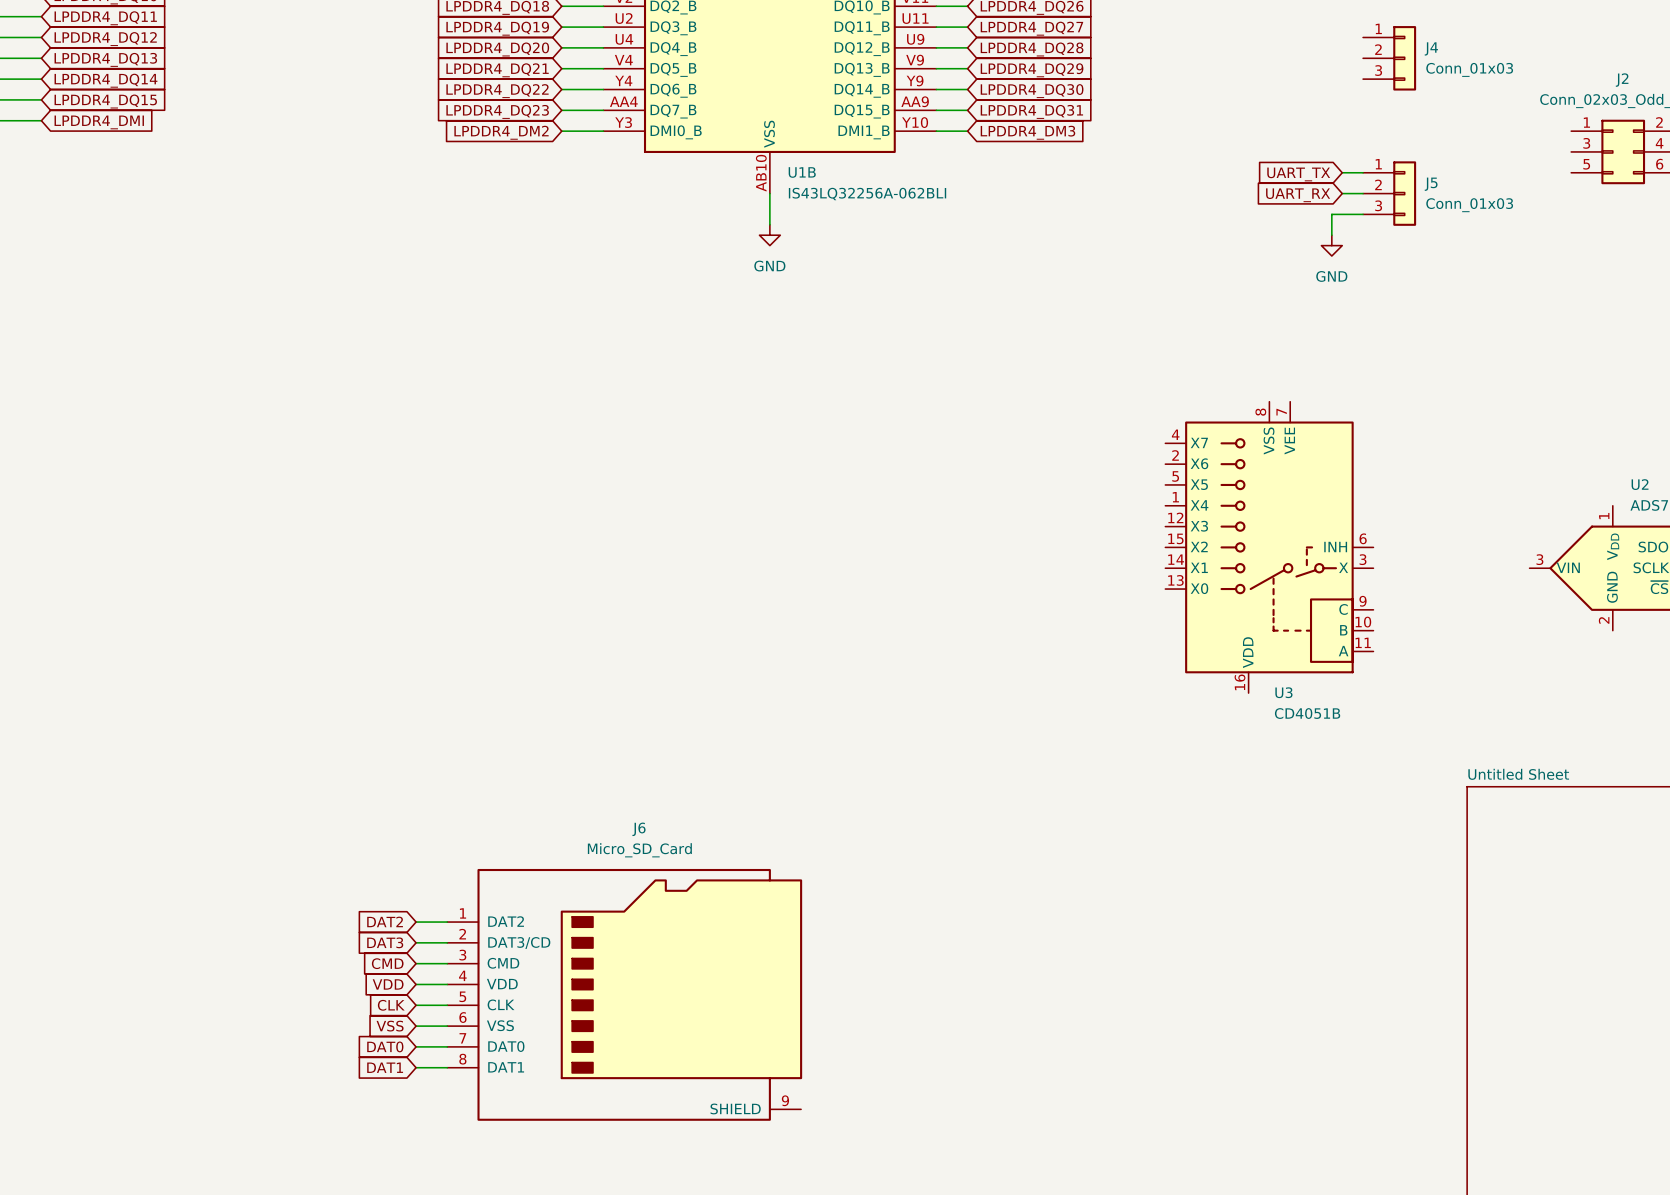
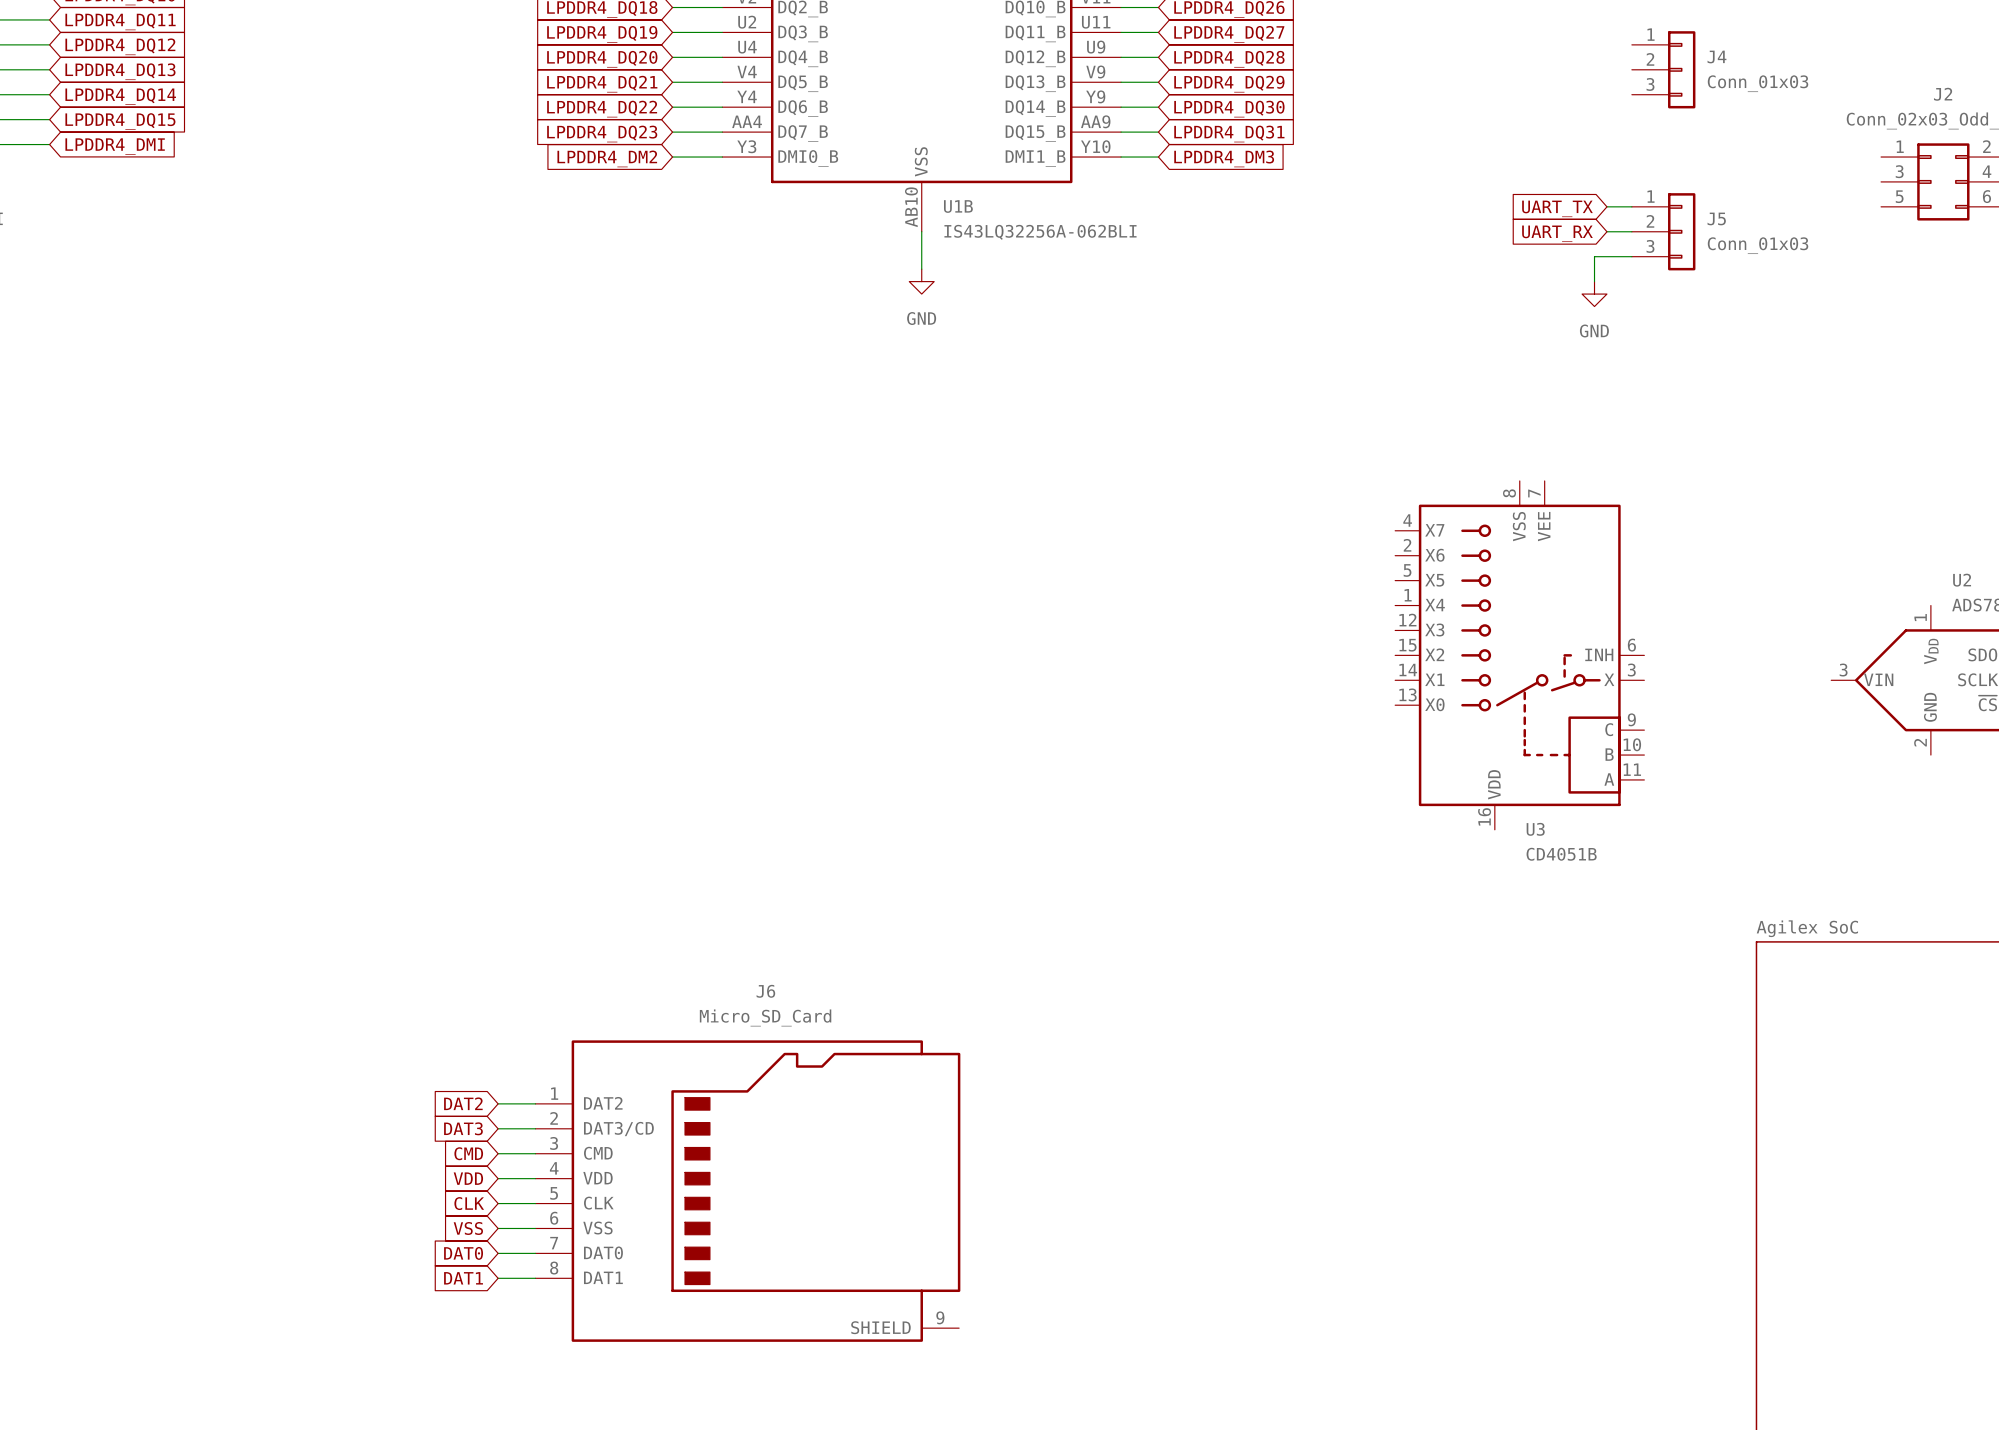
sheet Untitled Sheet name: Untitled Sheet (1518, 774) -> Agilex SoC (1807, 928)

